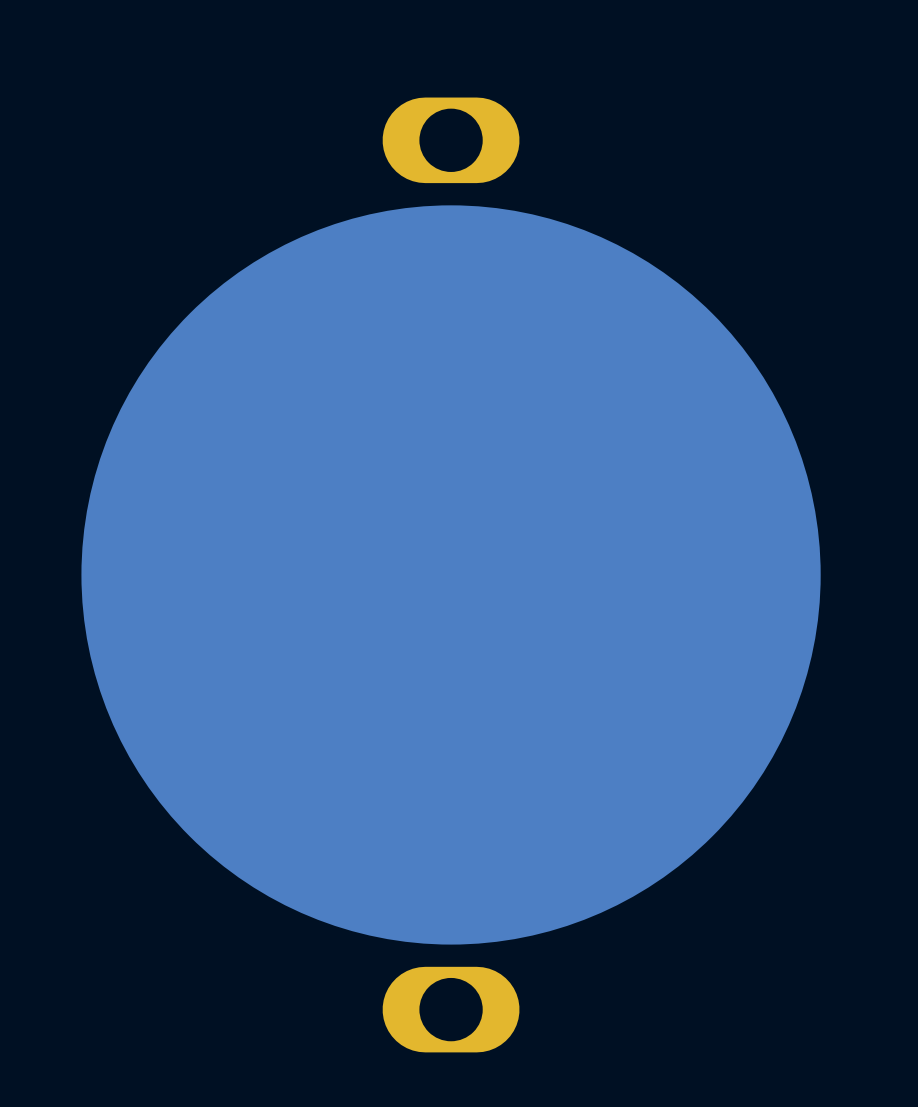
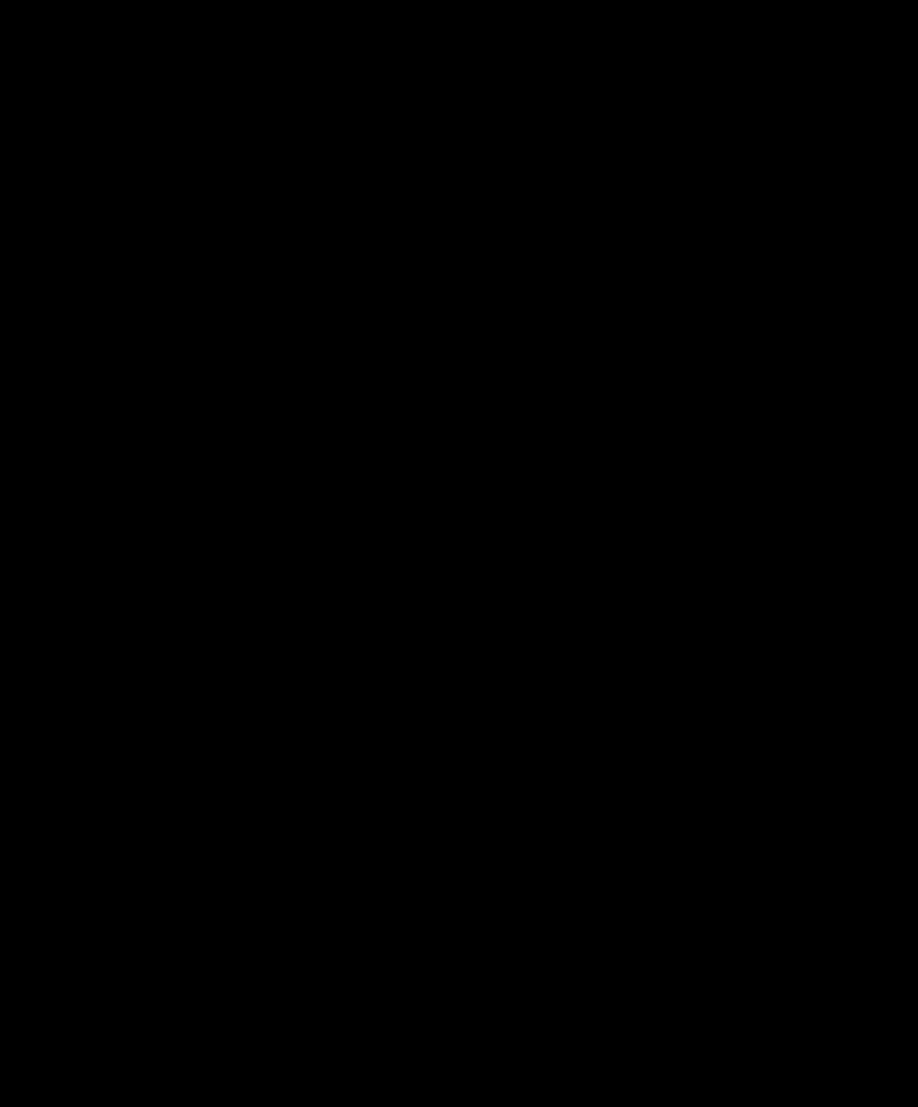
part: (451, 574) -> none

